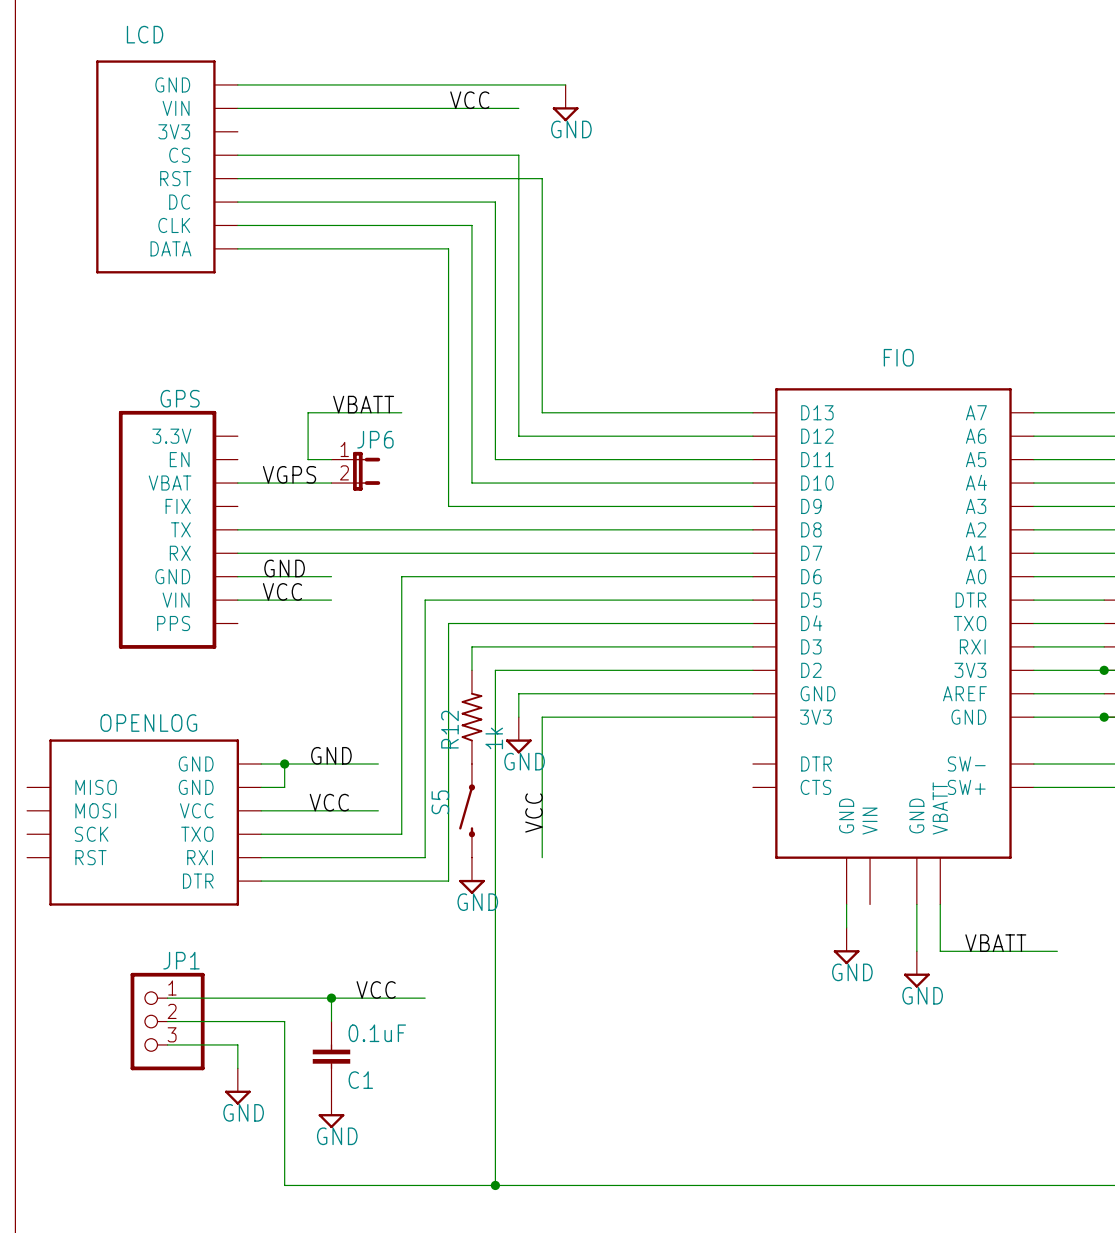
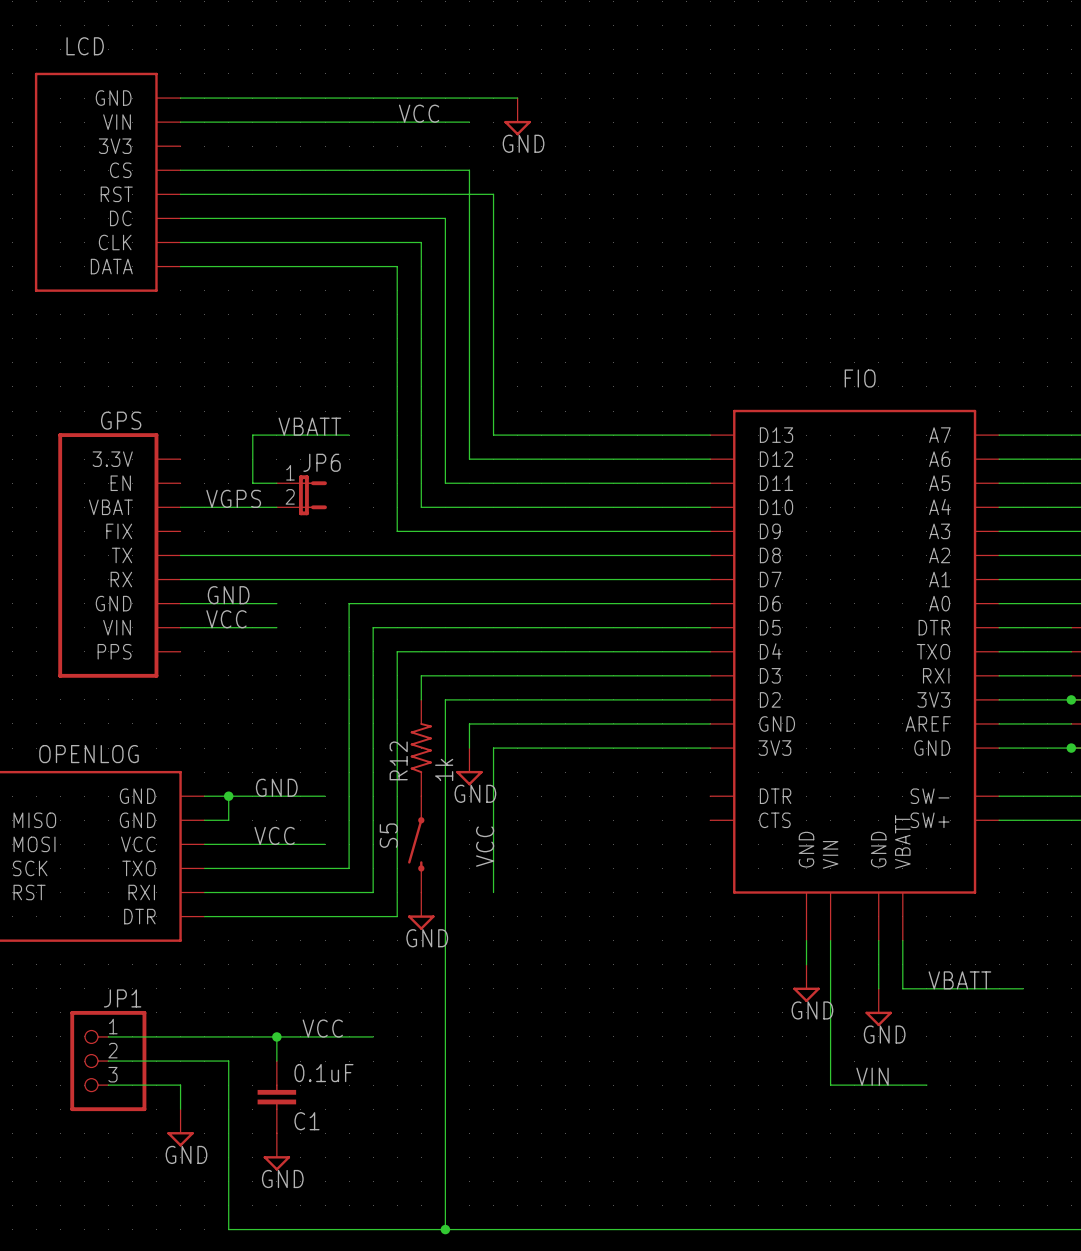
wire: none -> (830, 940) (830, 1085) (926, 1085)
label: none -> VIN (872, 1076)

